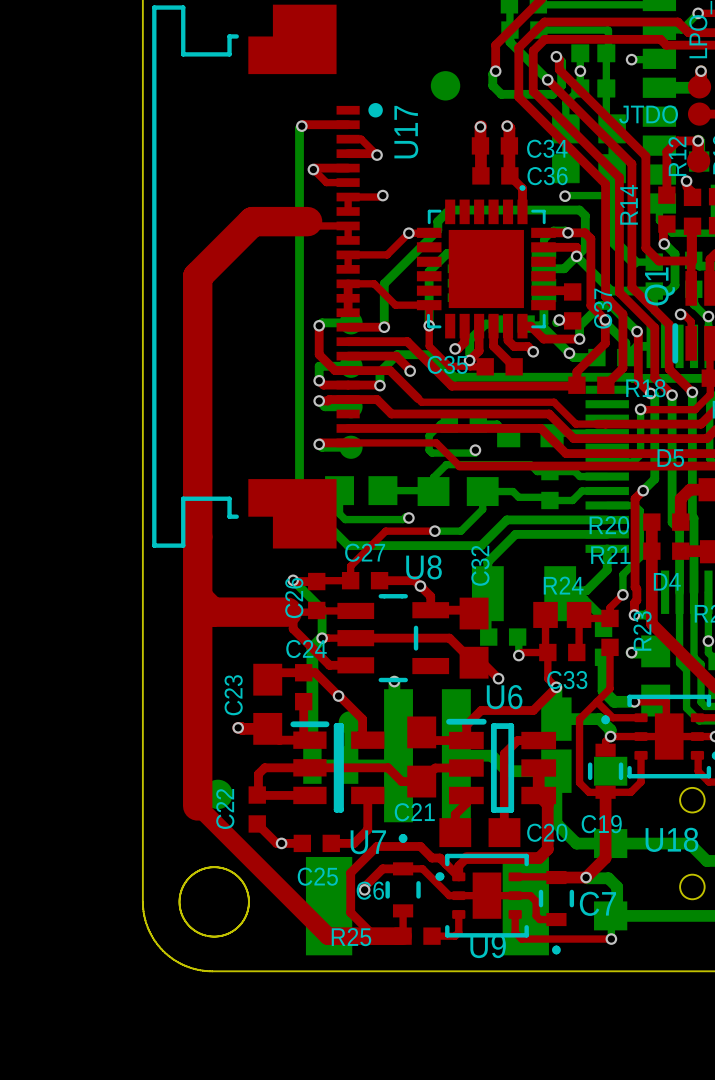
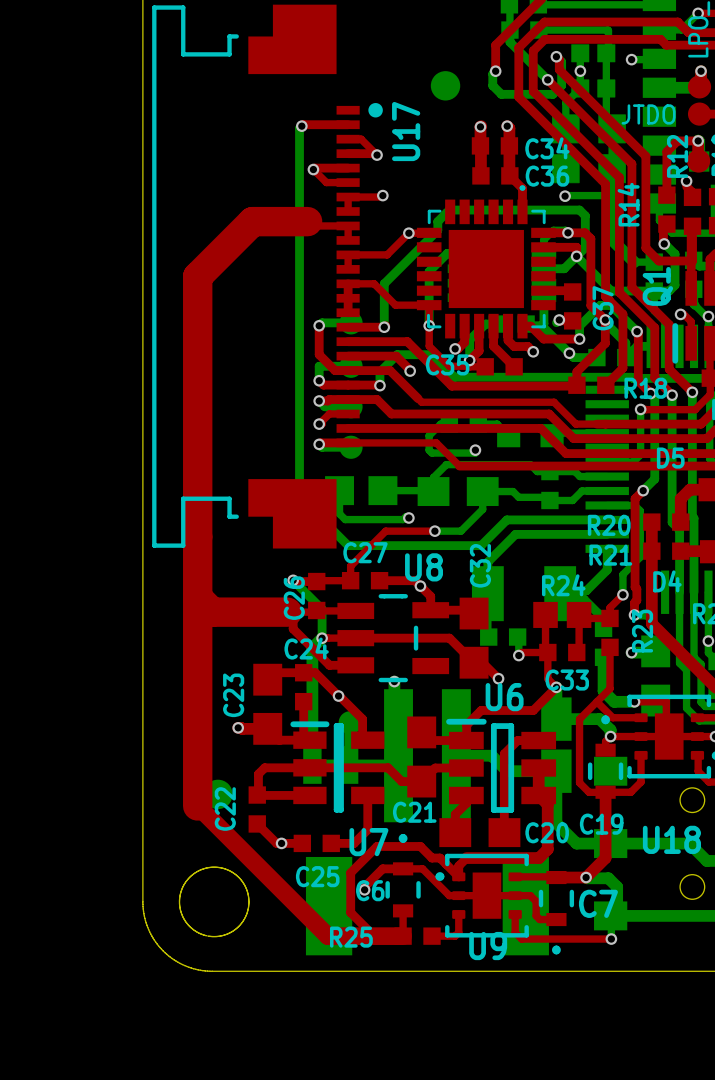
top track: none -> (348, 413) (329, 413) (322, 421) (322, 424) (319, 424)
via: none -> (319, 424)

